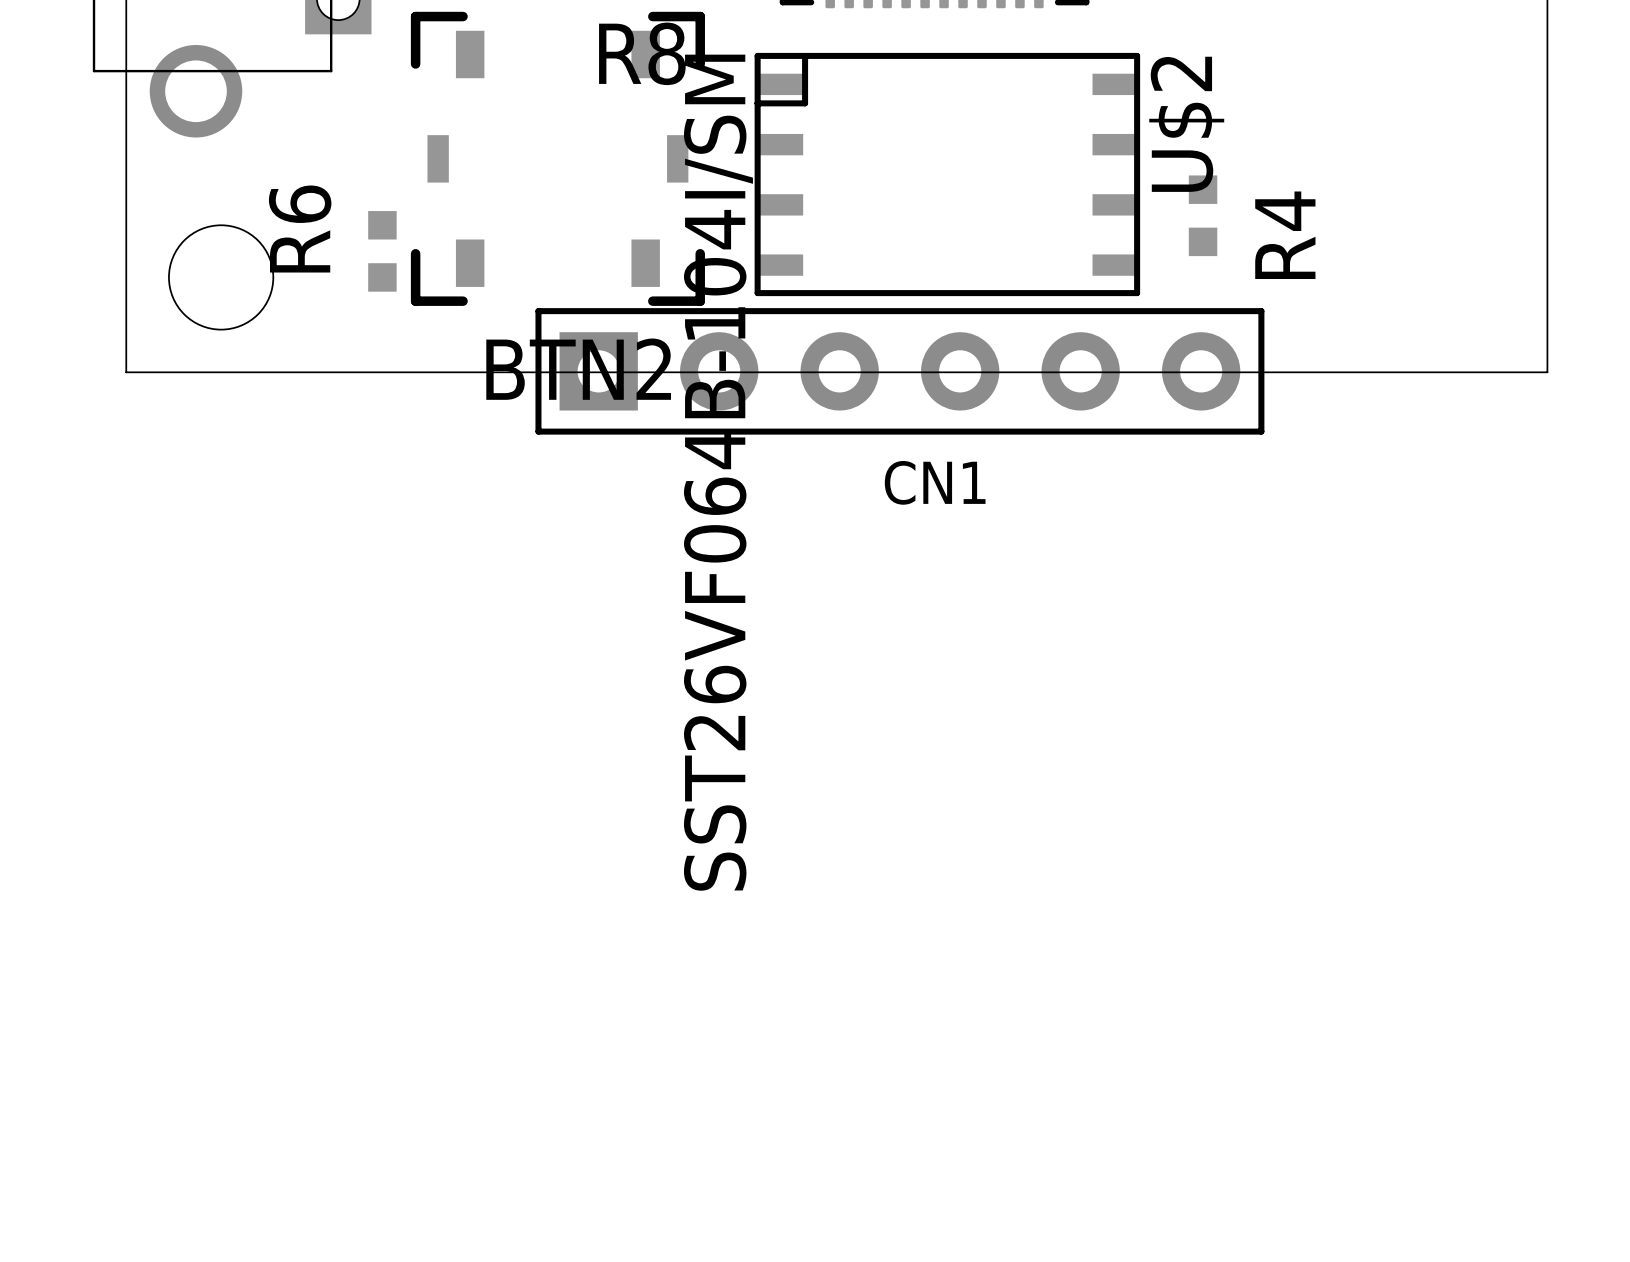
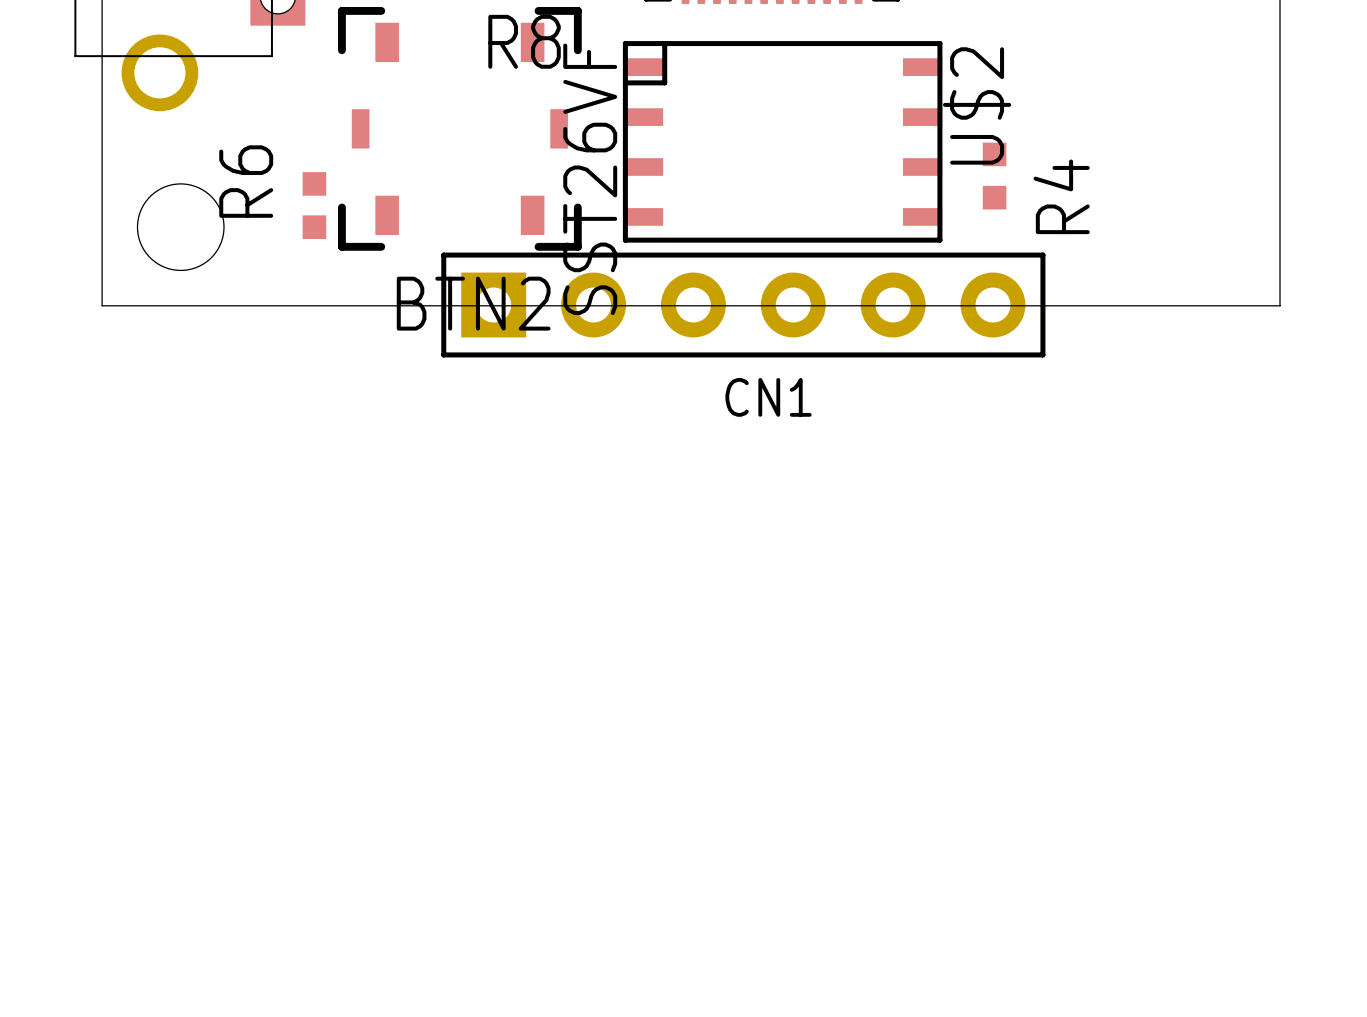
U$2 value: SST26VF064B-104I/SM (718, 472) -> SST26VF (590, 179)

